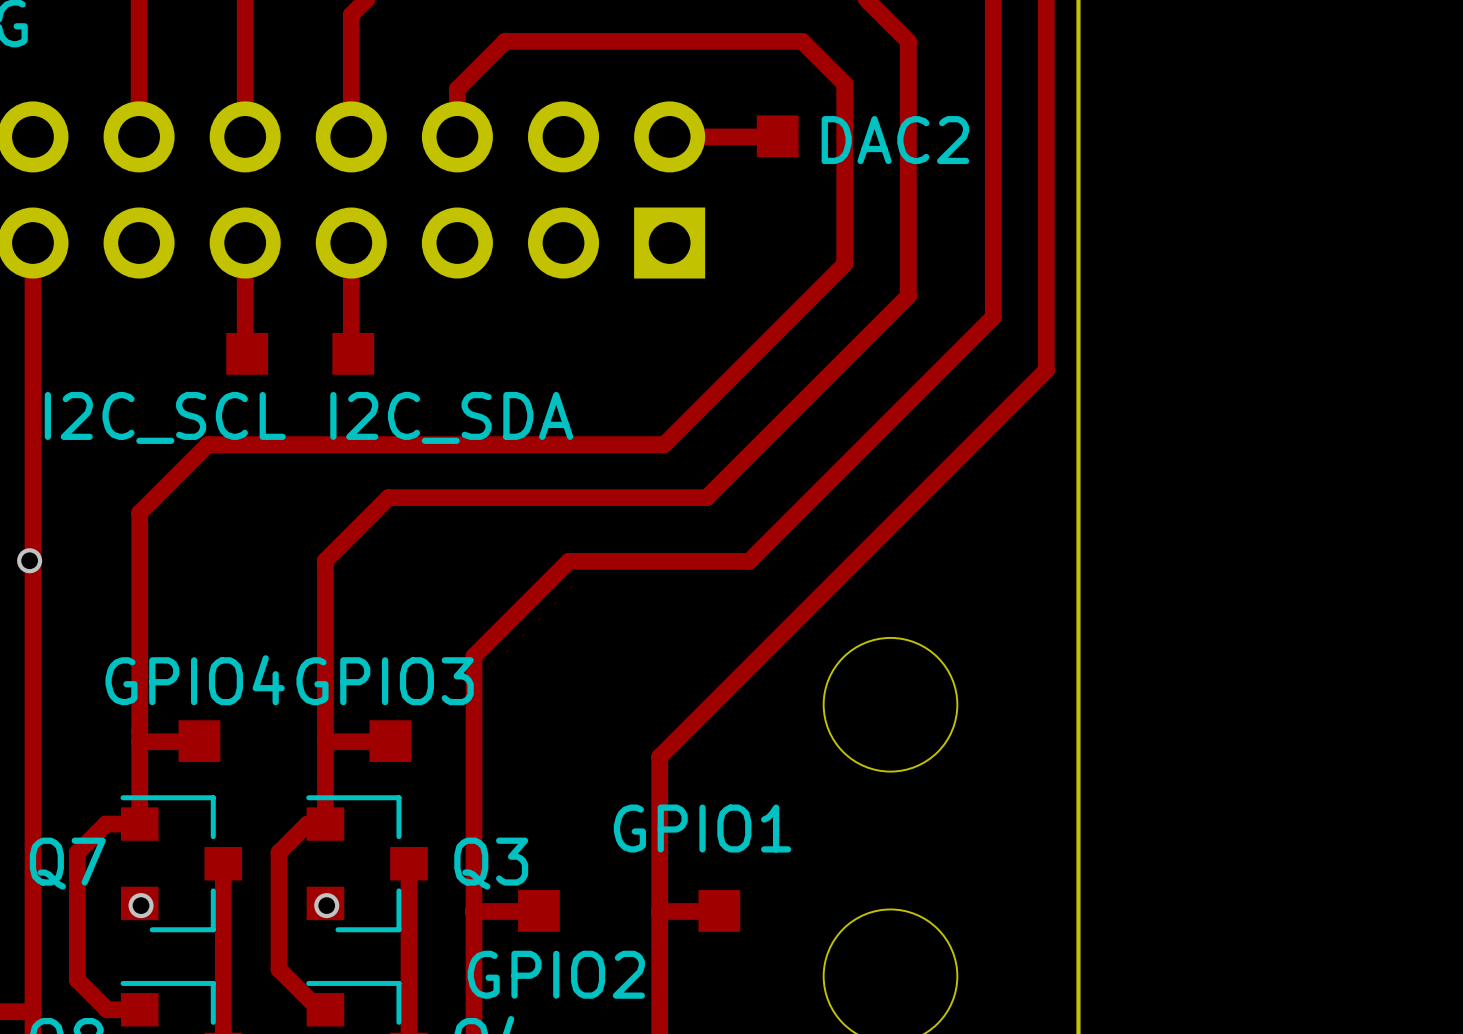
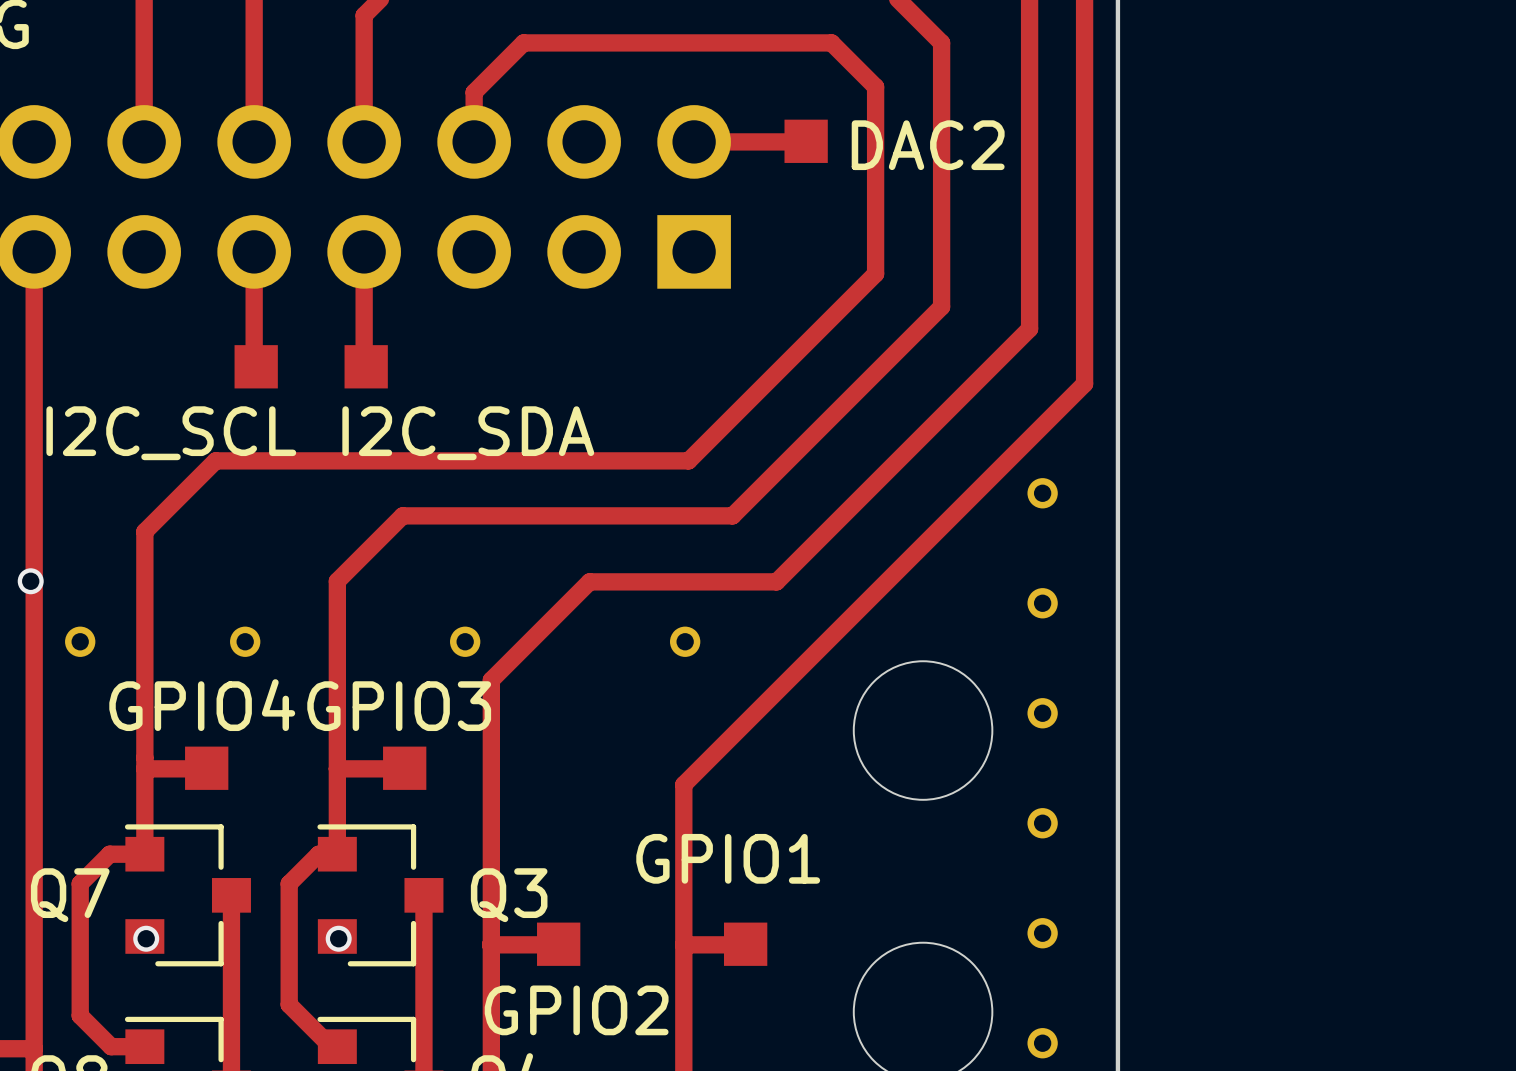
part: none -> (1042, 493)
part: none -> (1042, 603)
part: none -> (80, 641)
part: none -> (245, 641)
part: none -> (465, 641)
part: none -> (685, 641)
part: none -> (1042, 713)
part: none -> (1042, 823)
part: none -> (1042, 933)
part: none -> (1042, 1043)

